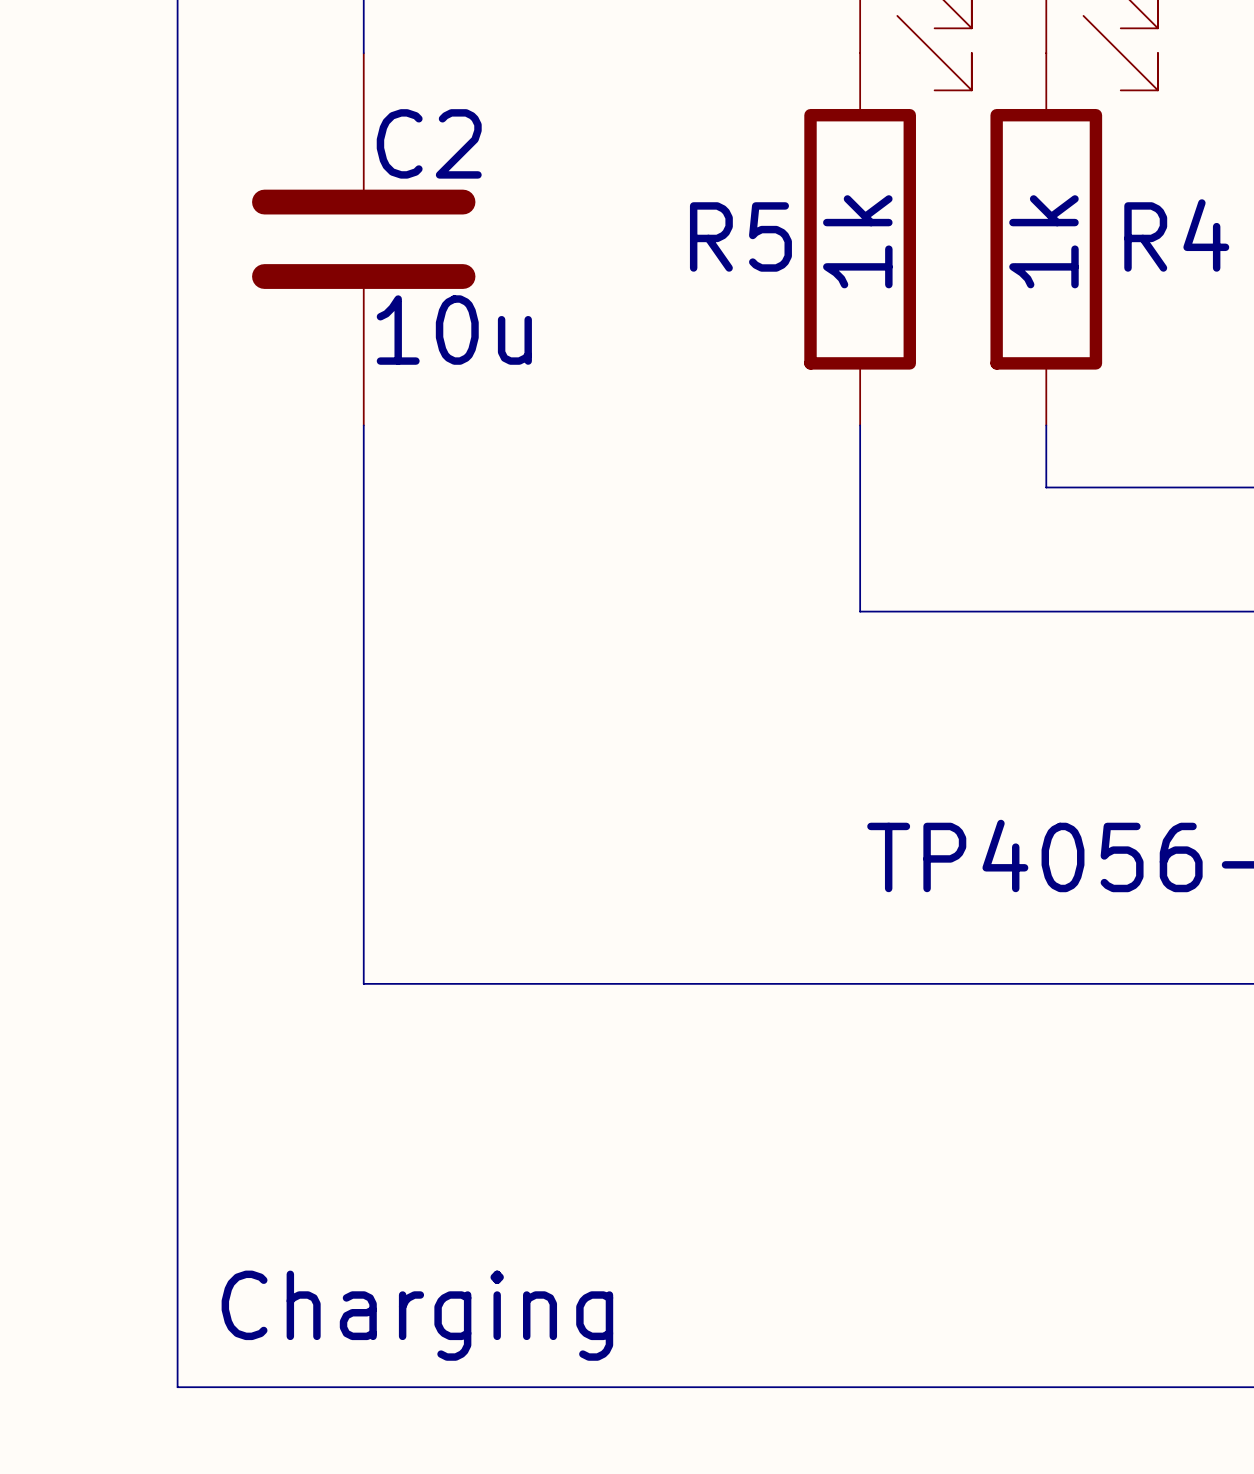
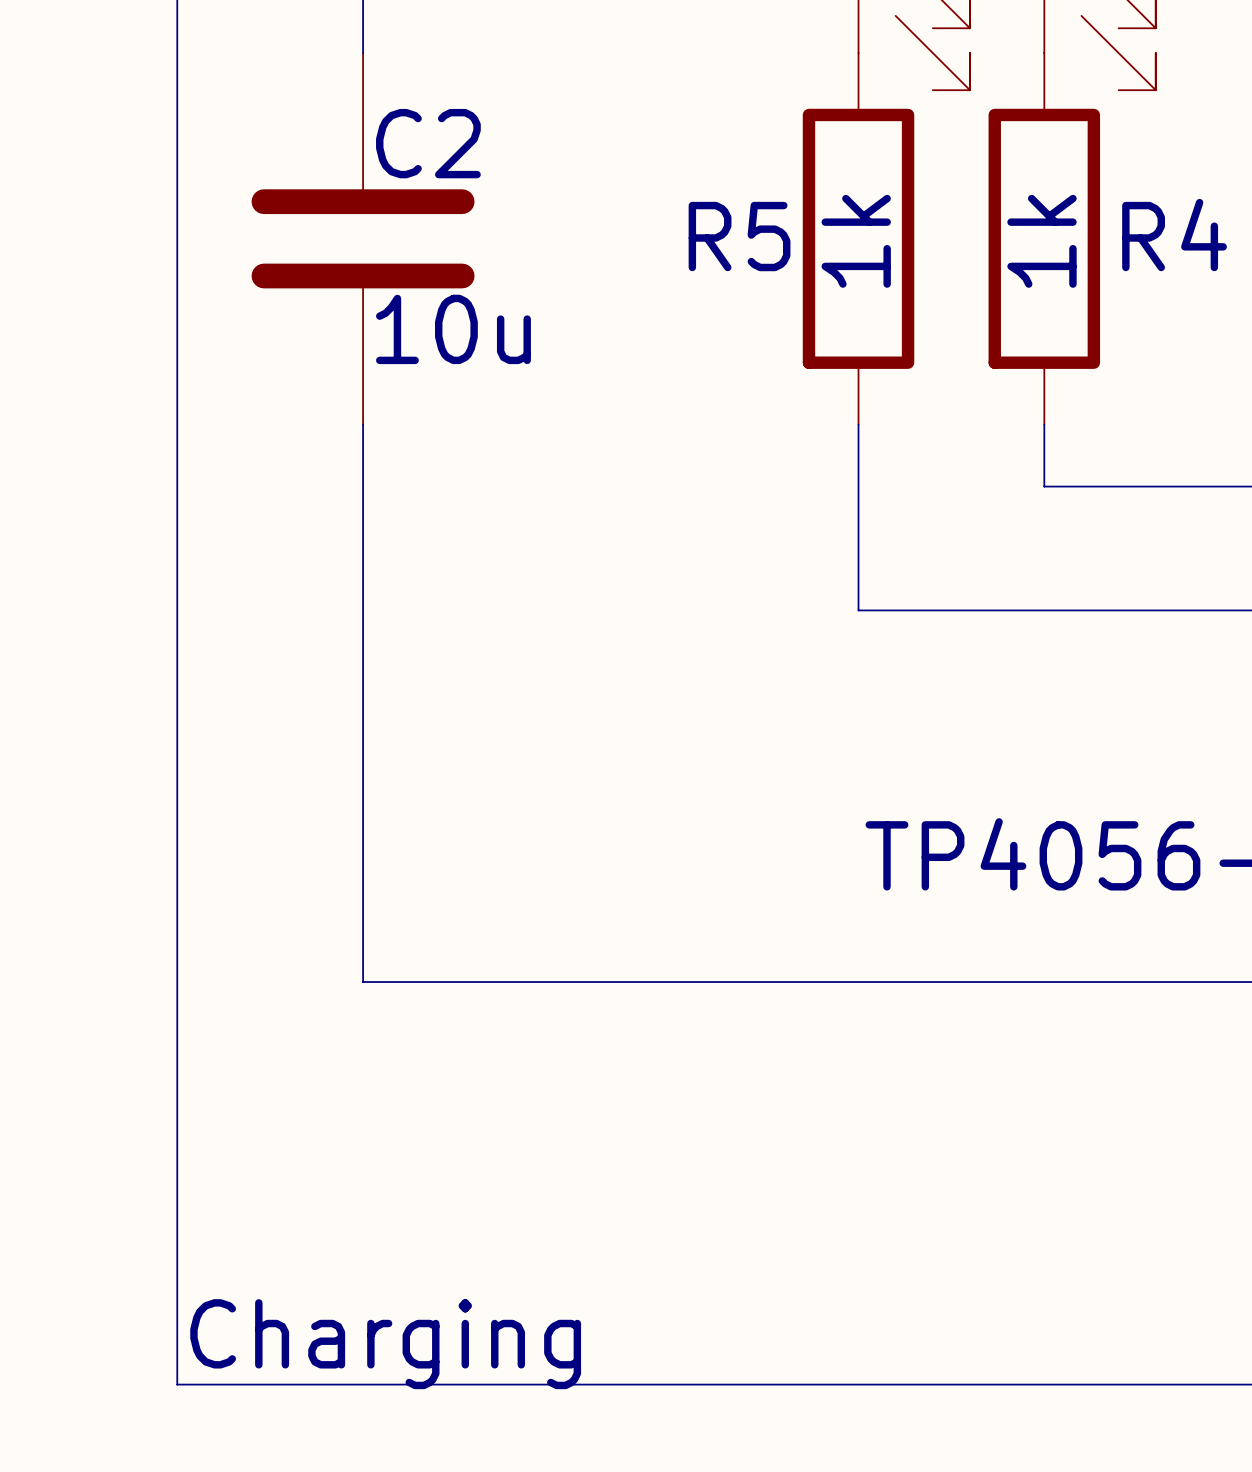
text position: Charging (417, 1315) -> Charging (385, 1344)

